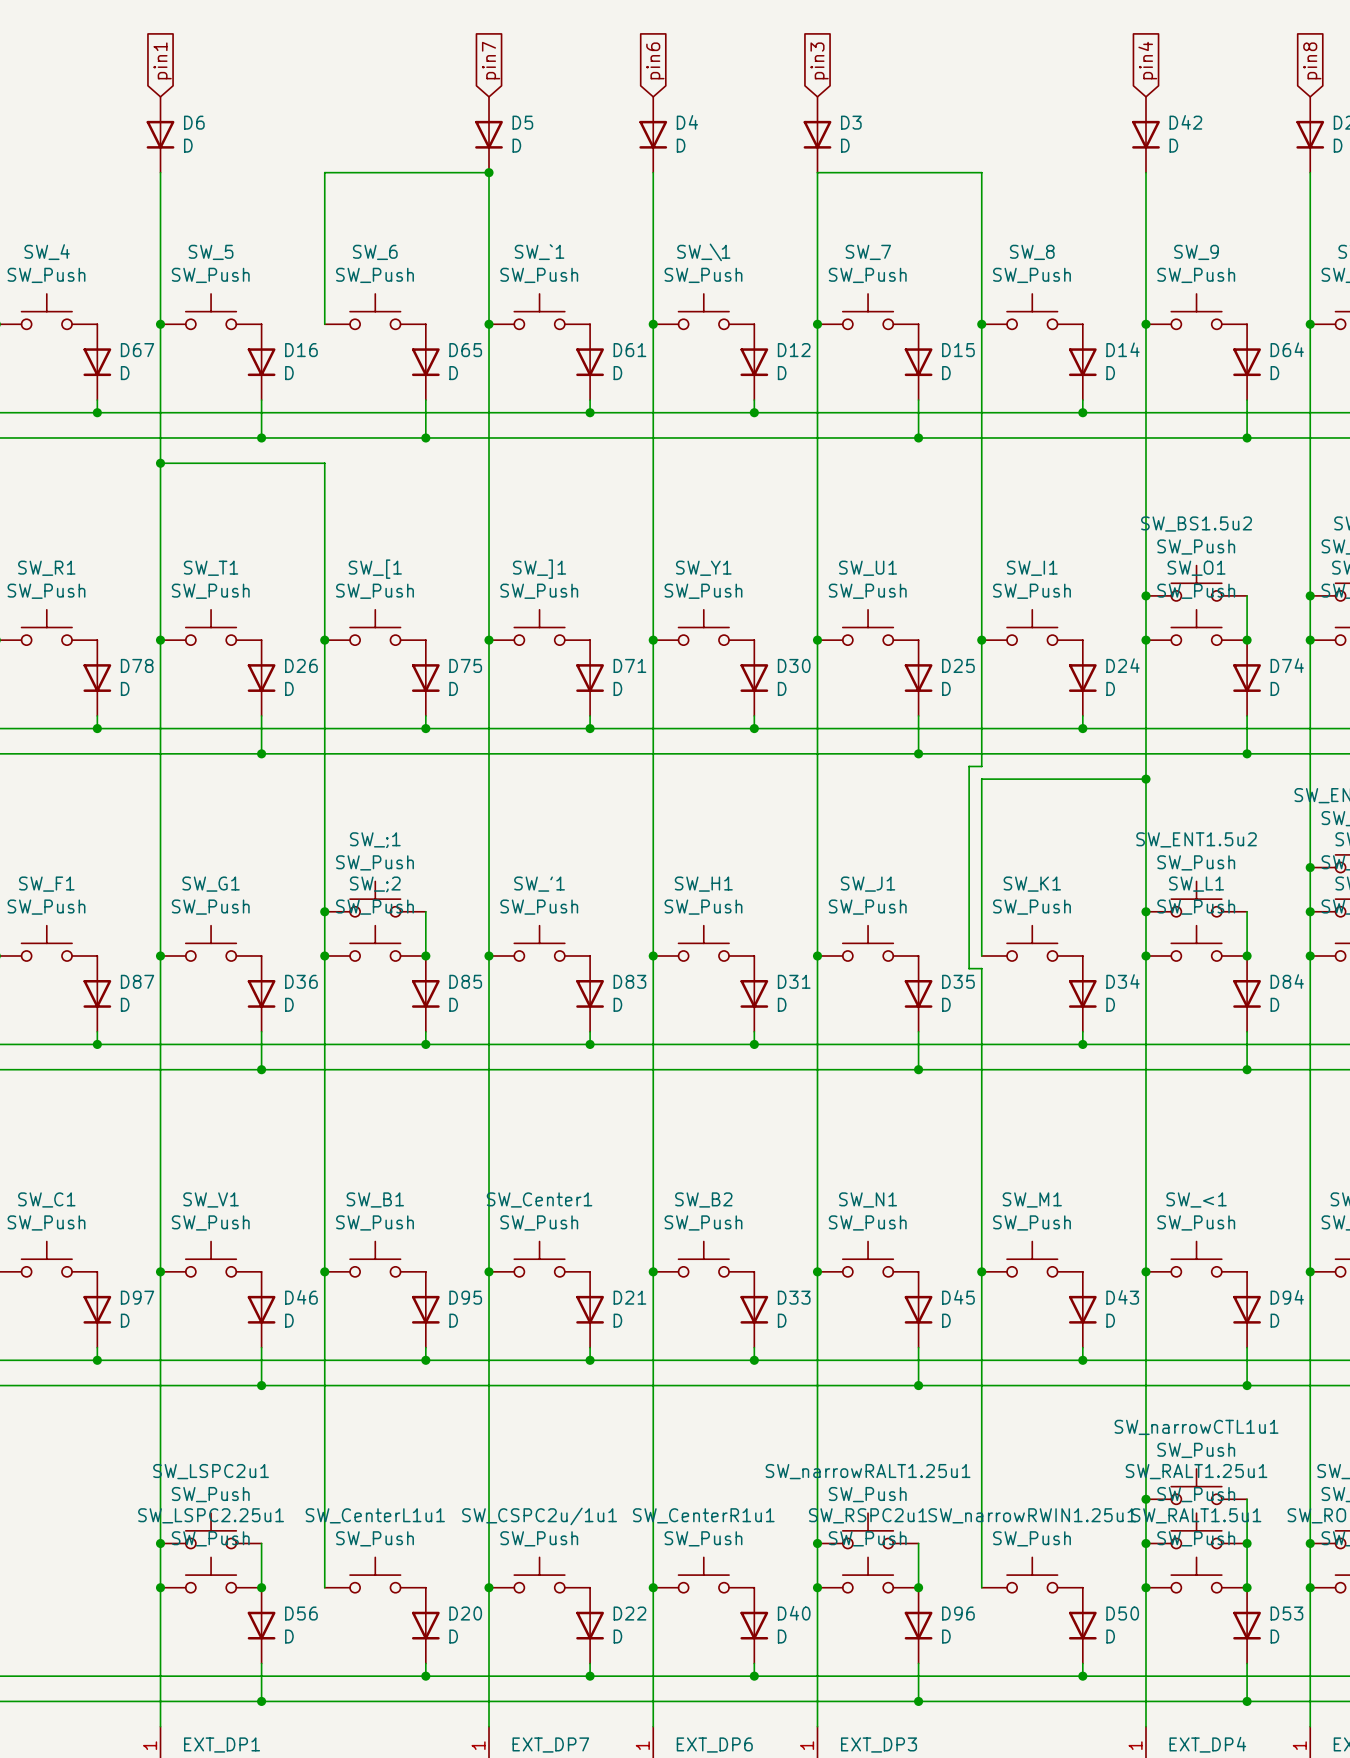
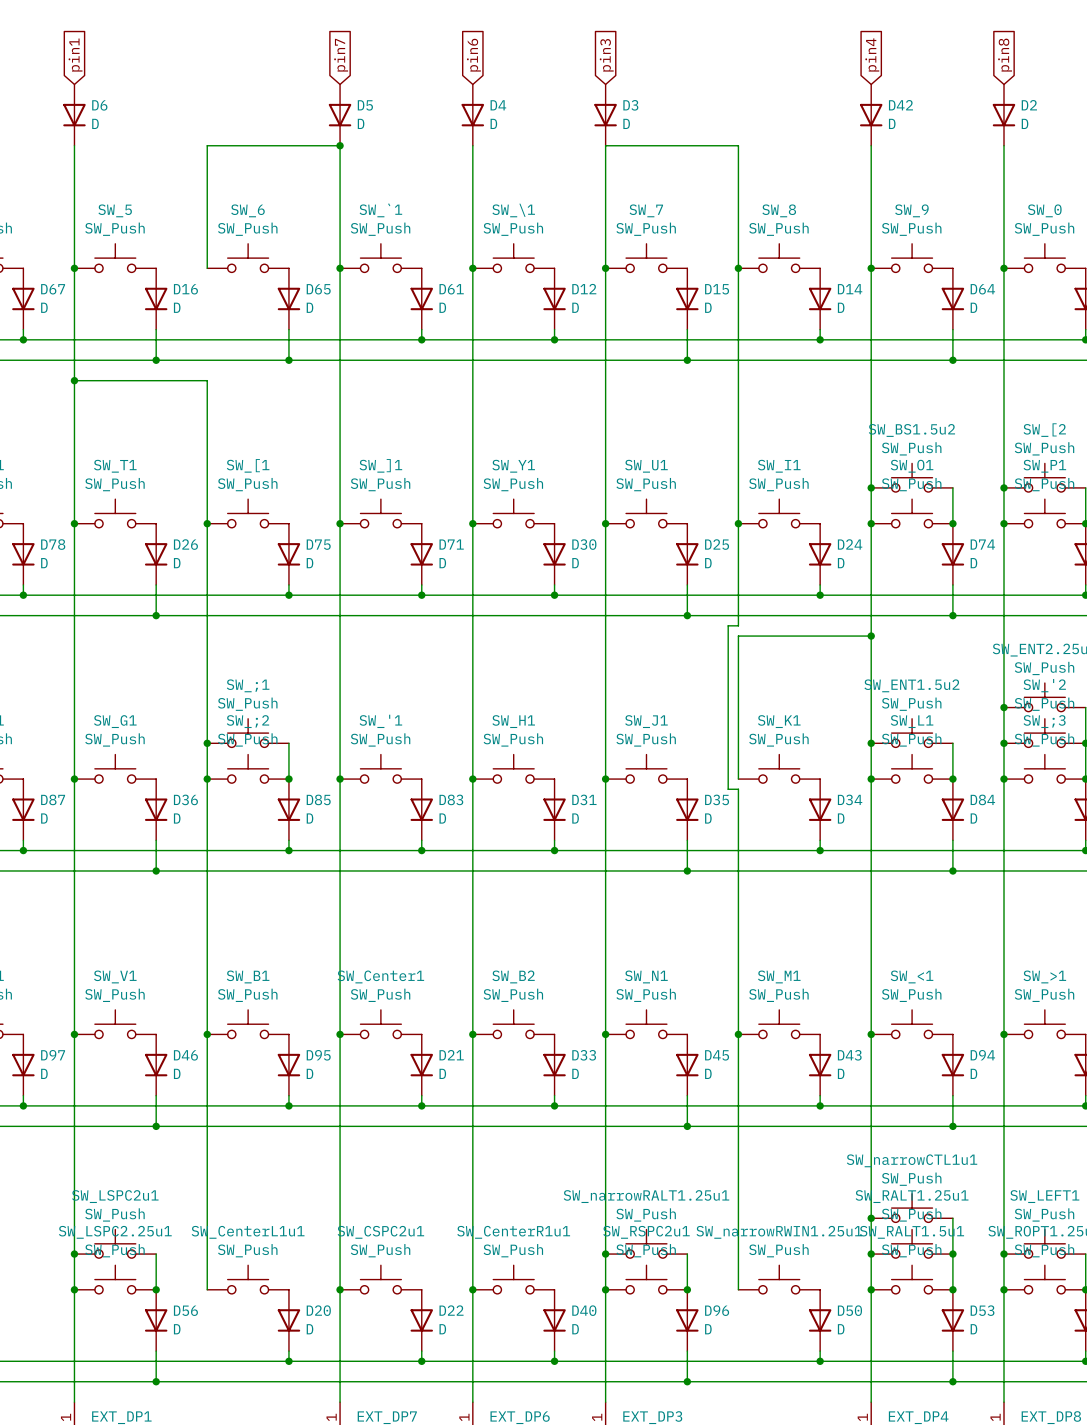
SW_CSPC2u/1u1 name: SW_CSPC2u/1u1 (539, 1516) -> SW_CSPC2u1 (380, 1232)

